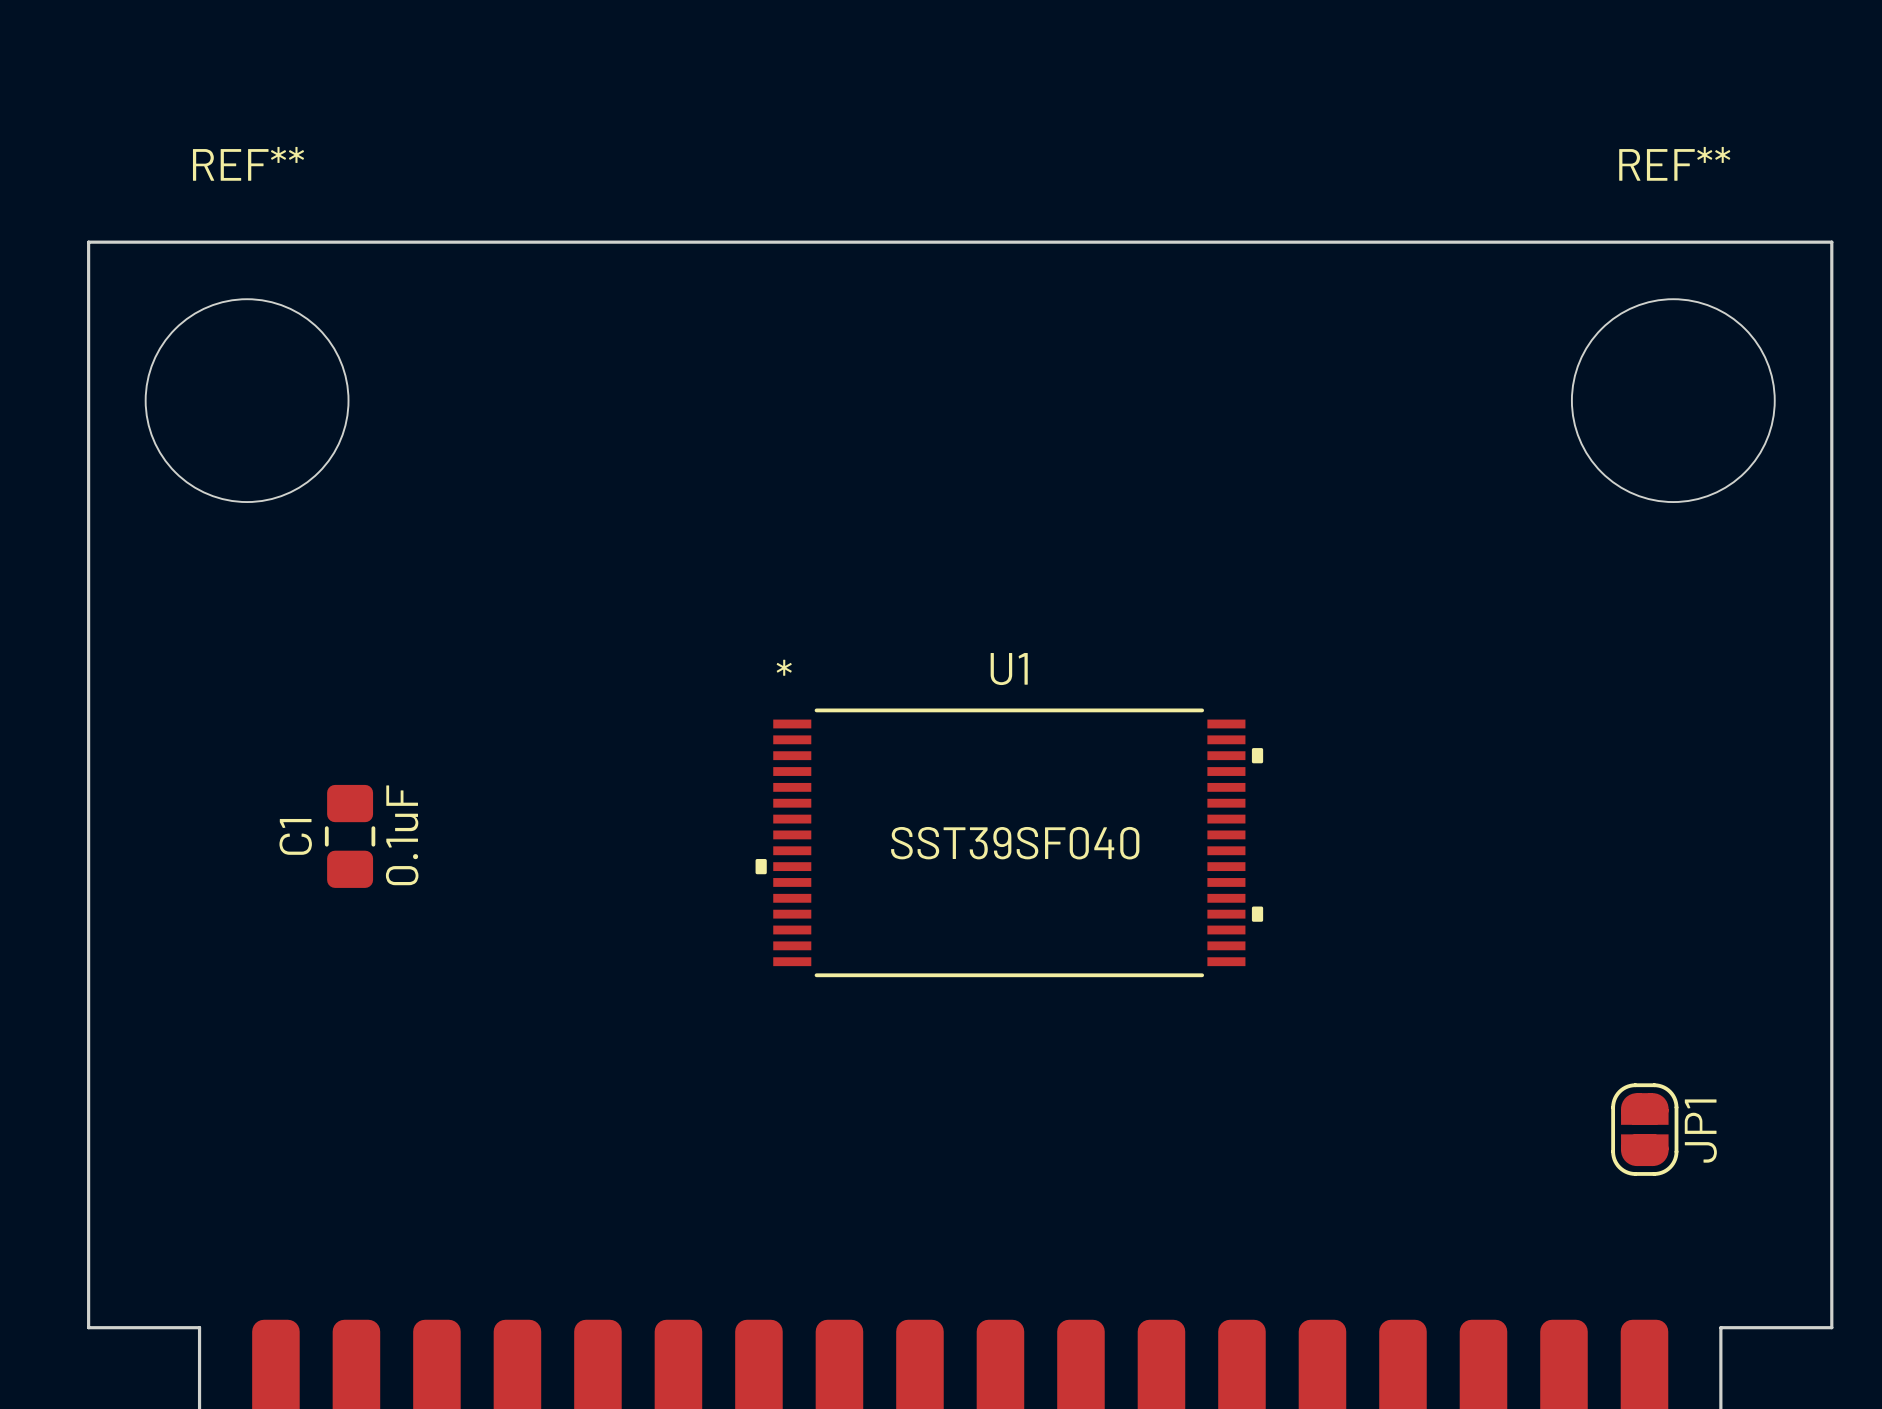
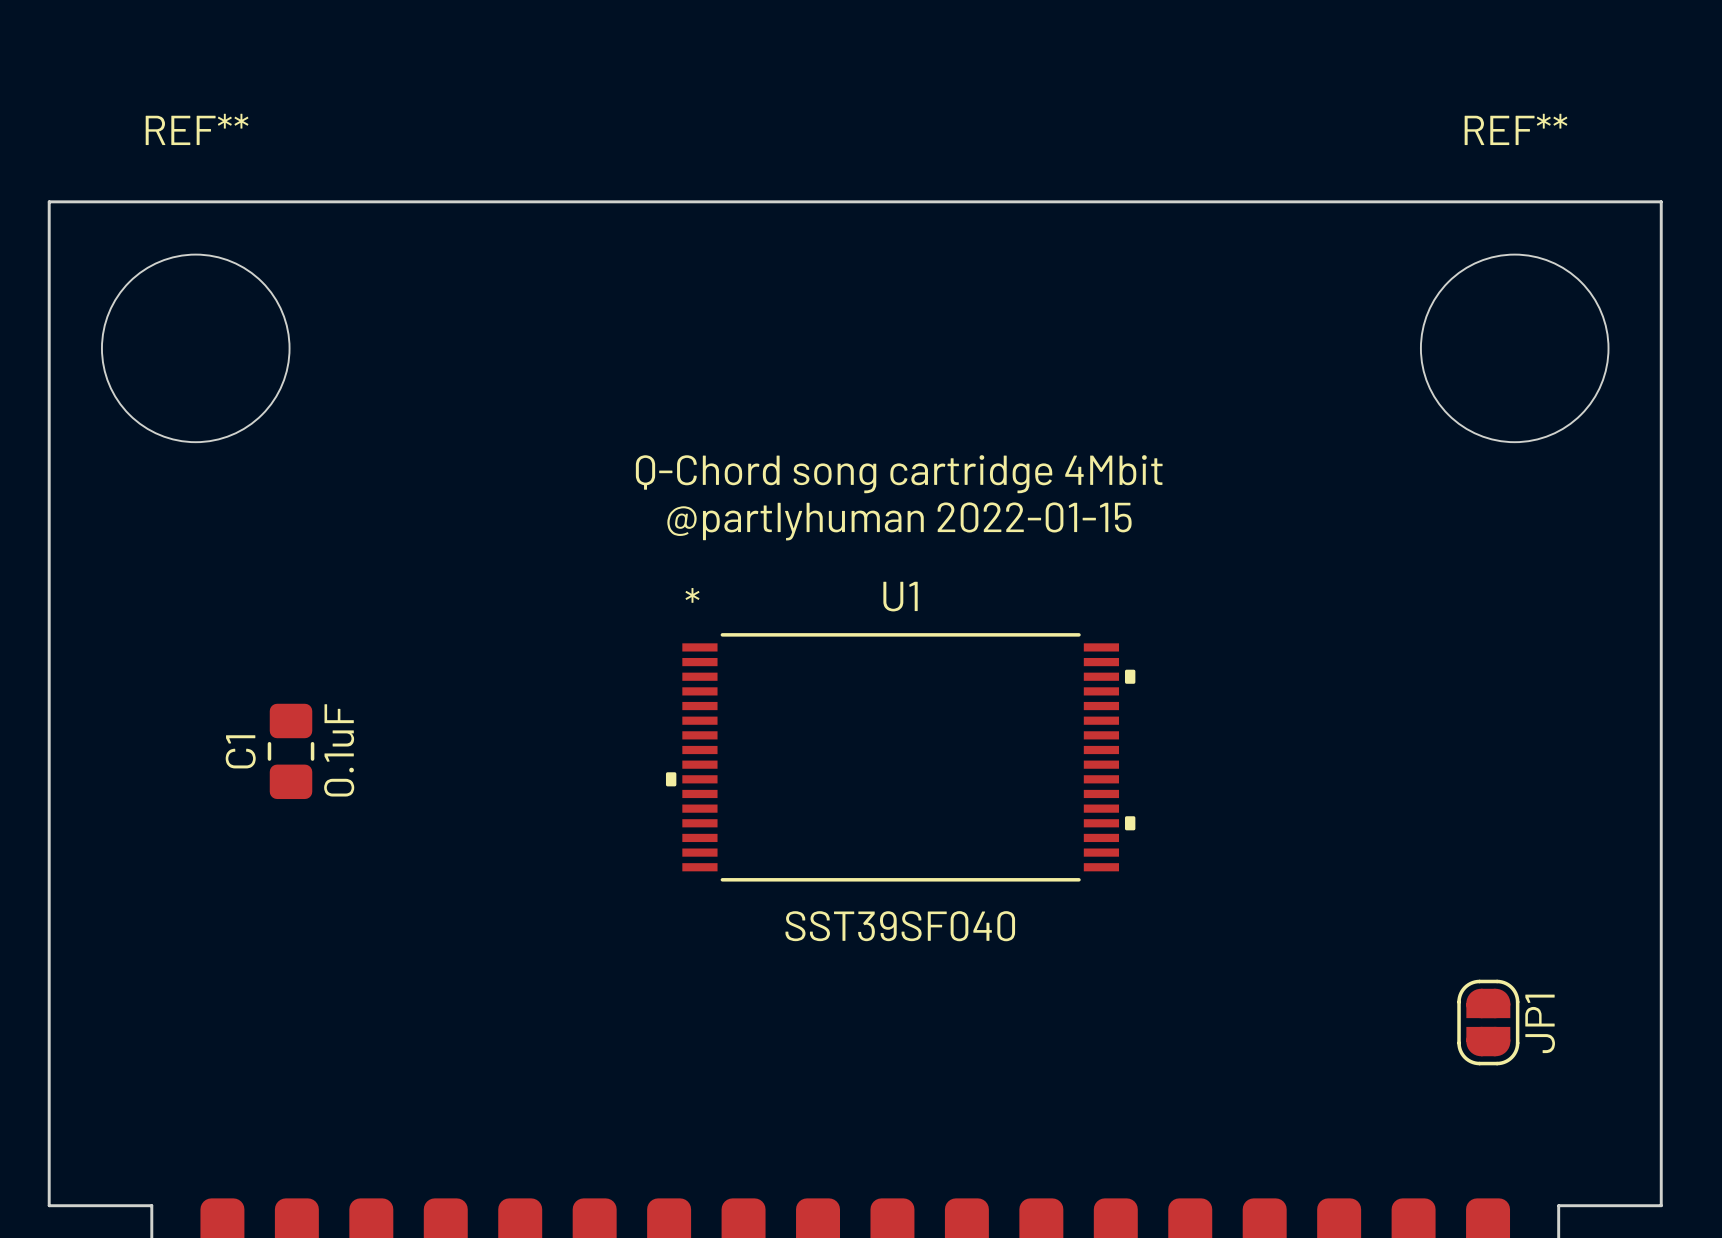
text: none -> Q-Chord song cartridge 4Mbit (899, 474)
text: none -> @partlyhuman 2022-01-15 (899, 521)
U1 value position: SST39SF040 (1015, 843) -> SST39SF040 (900, 926)

